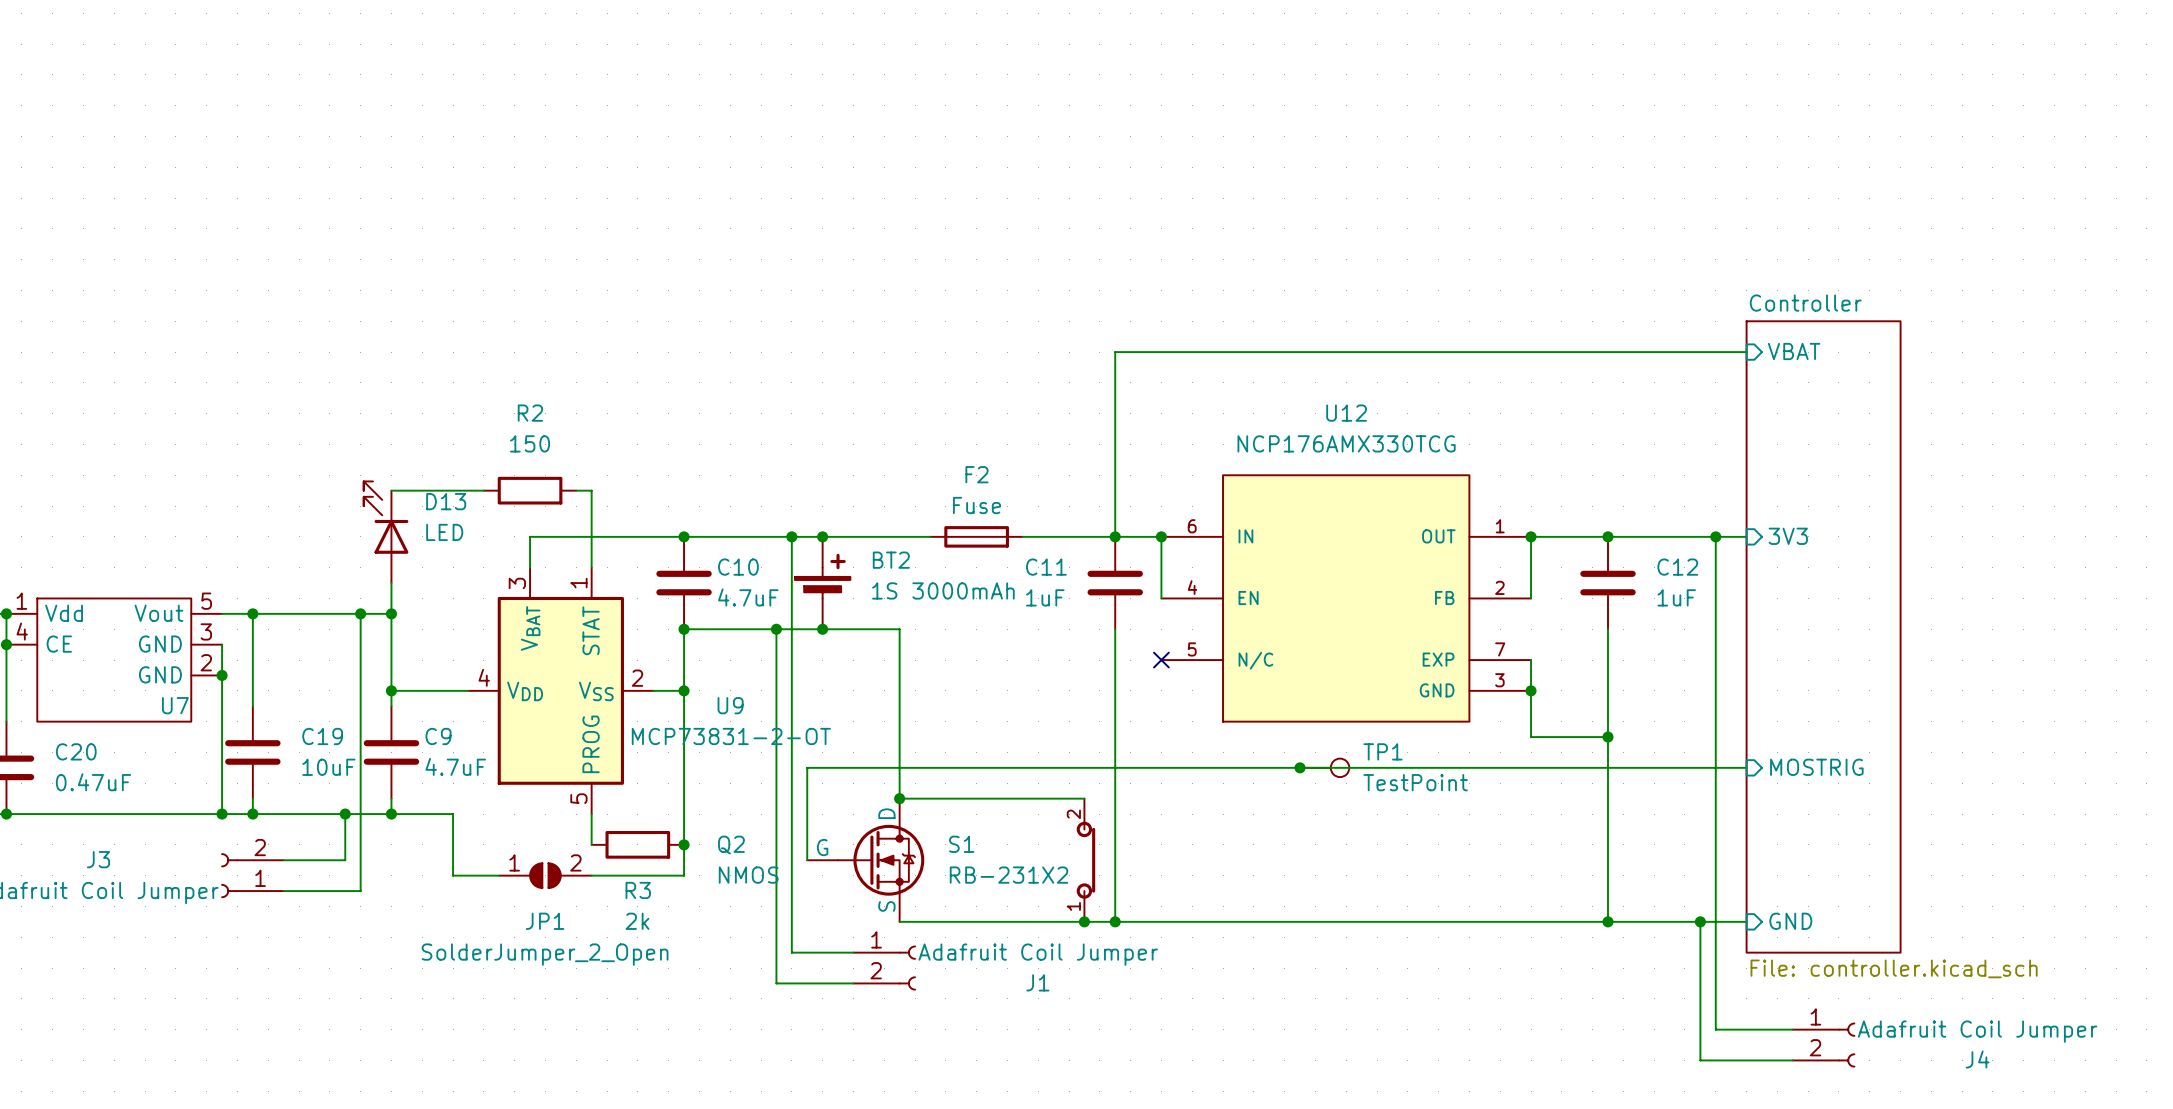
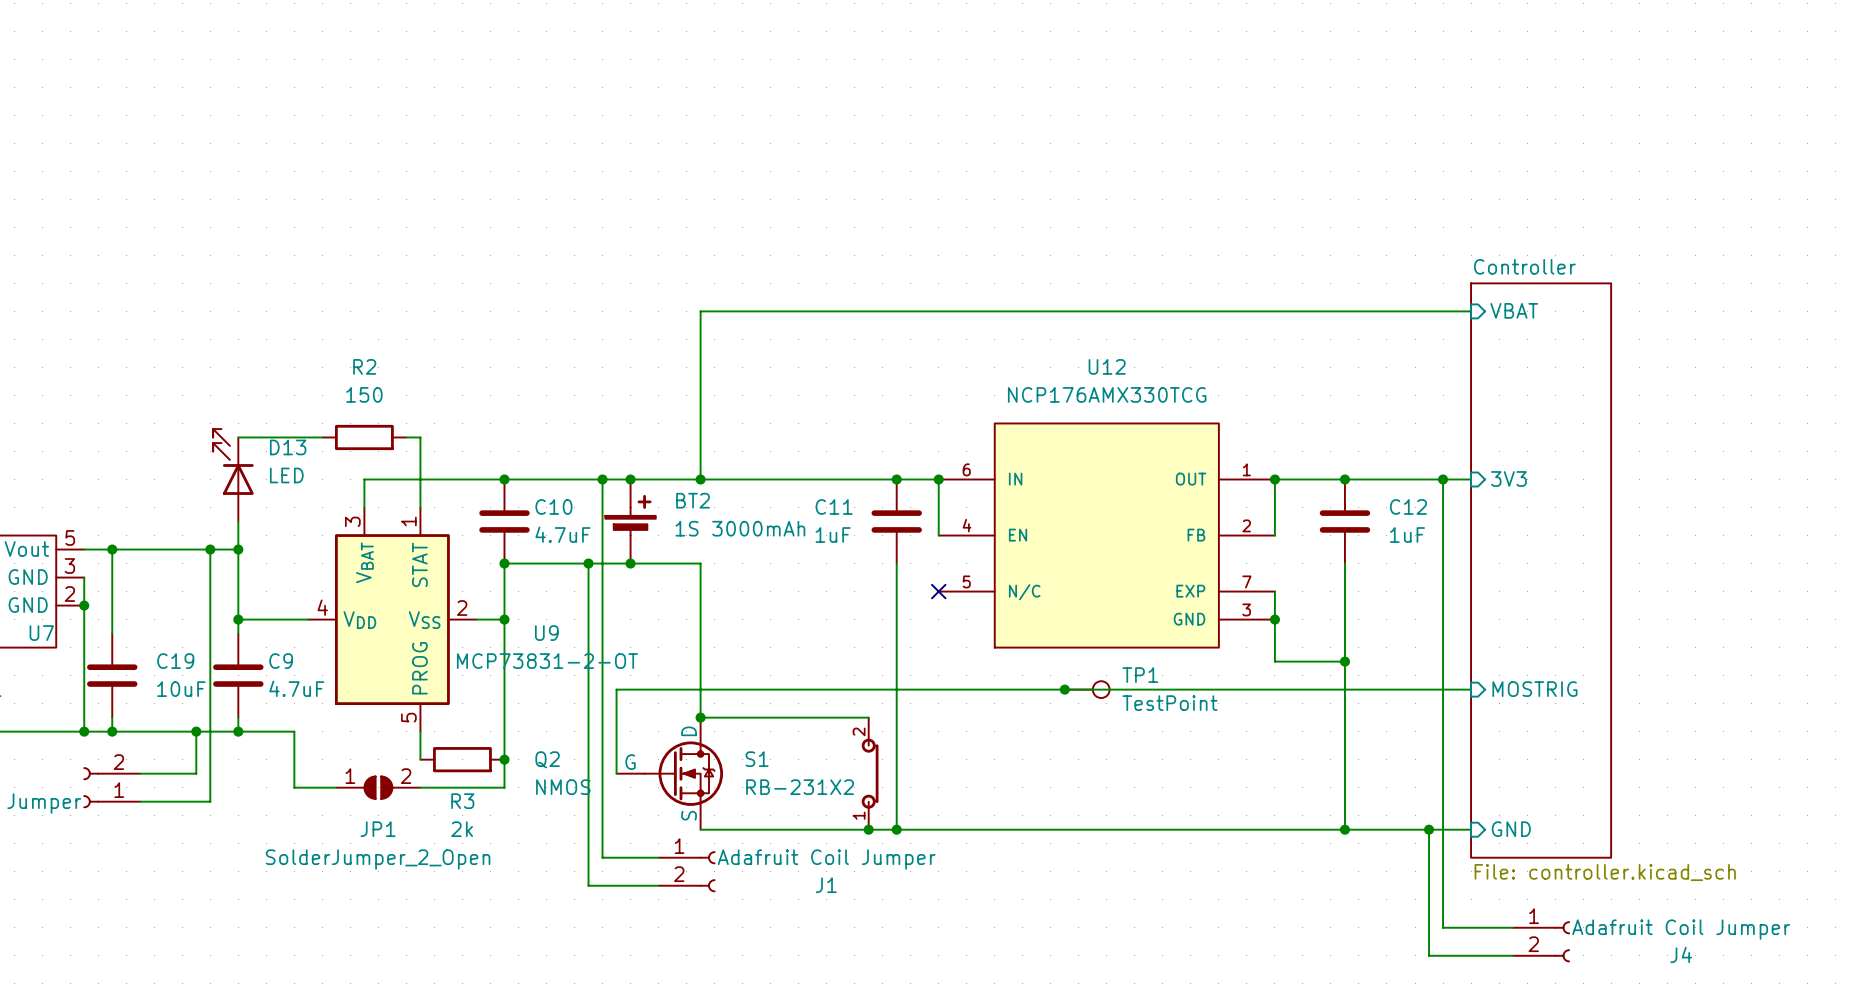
wire: (1115, 352) (1115, 536) -> (896, 311) (700, 311) (700, 479)
junction: none -> (700, 479)
F2: Fuse (976, 536) -> none

